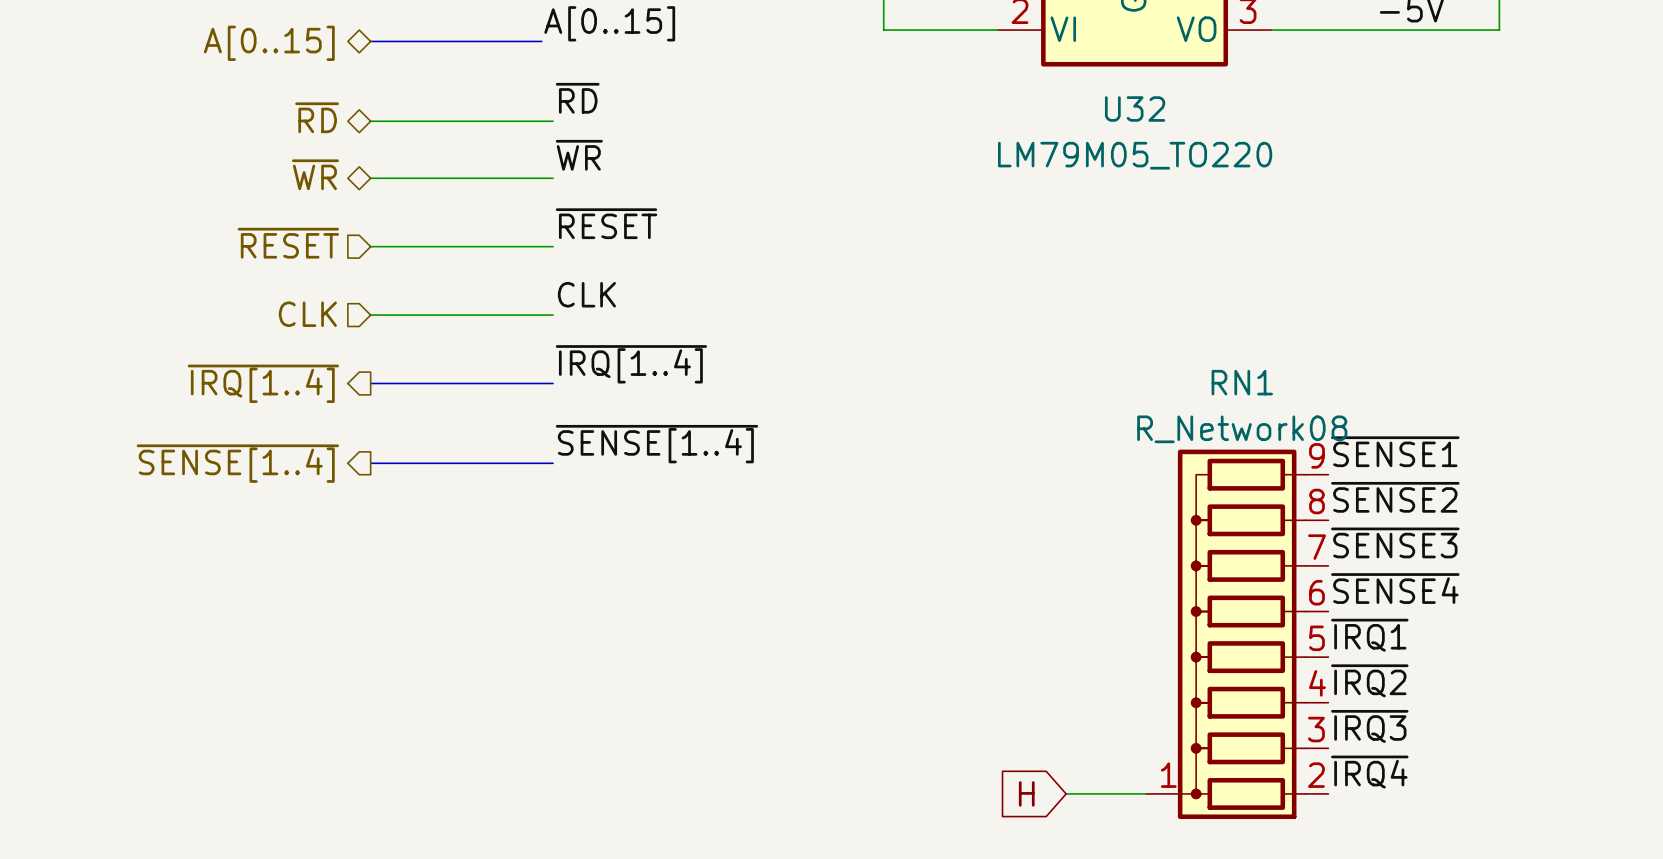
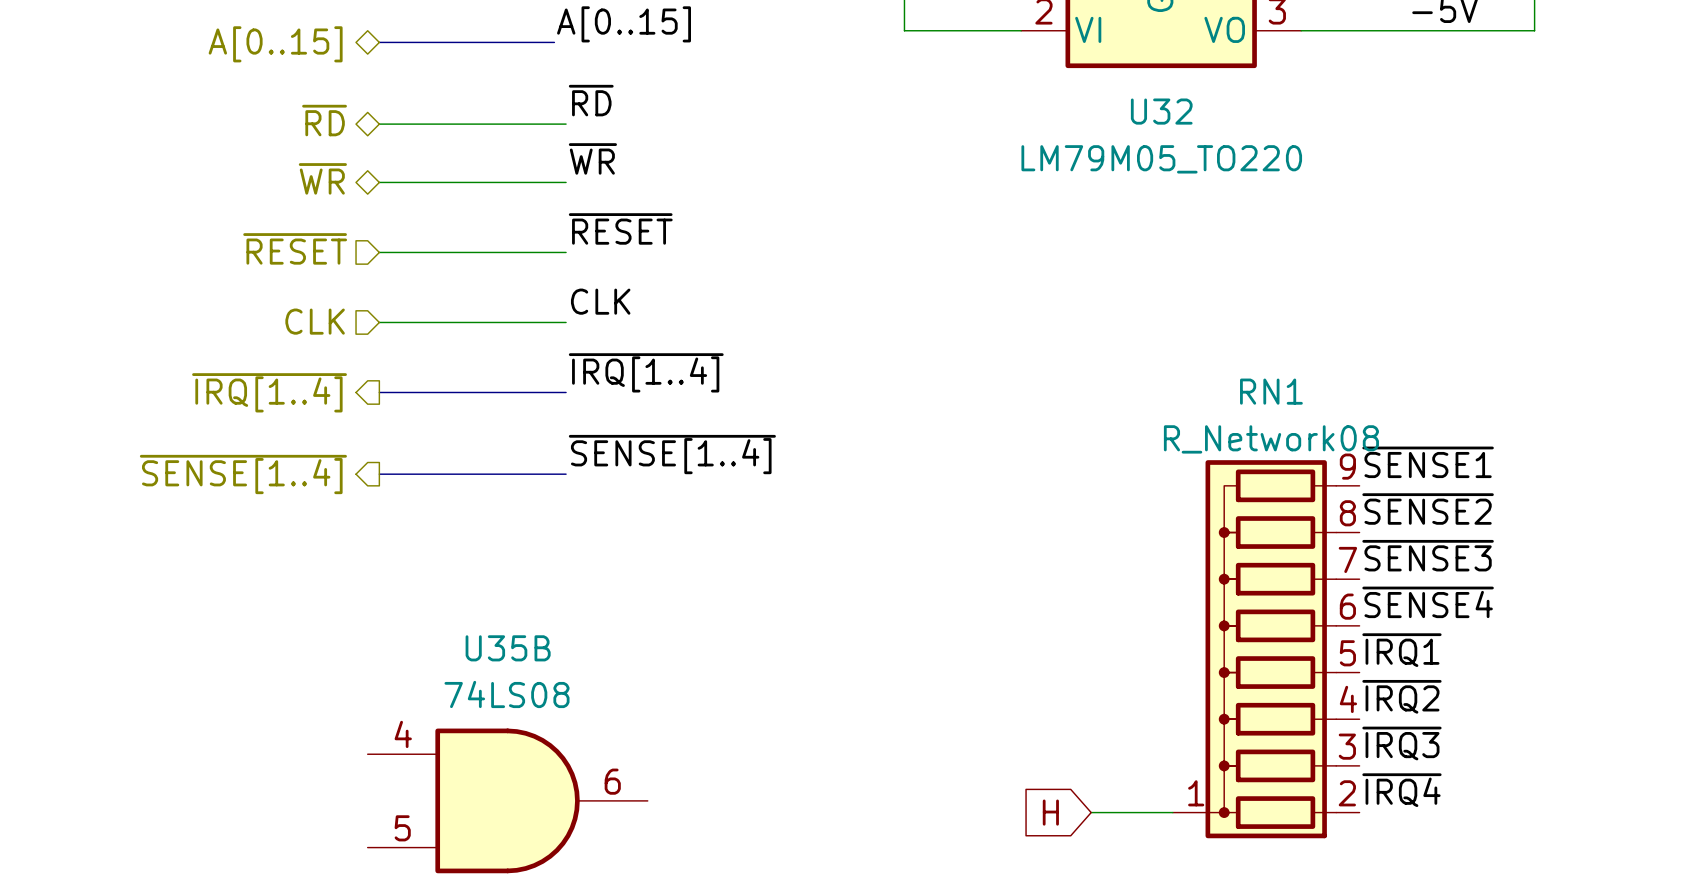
U35B: none -> 74LS08 (507, 800)

